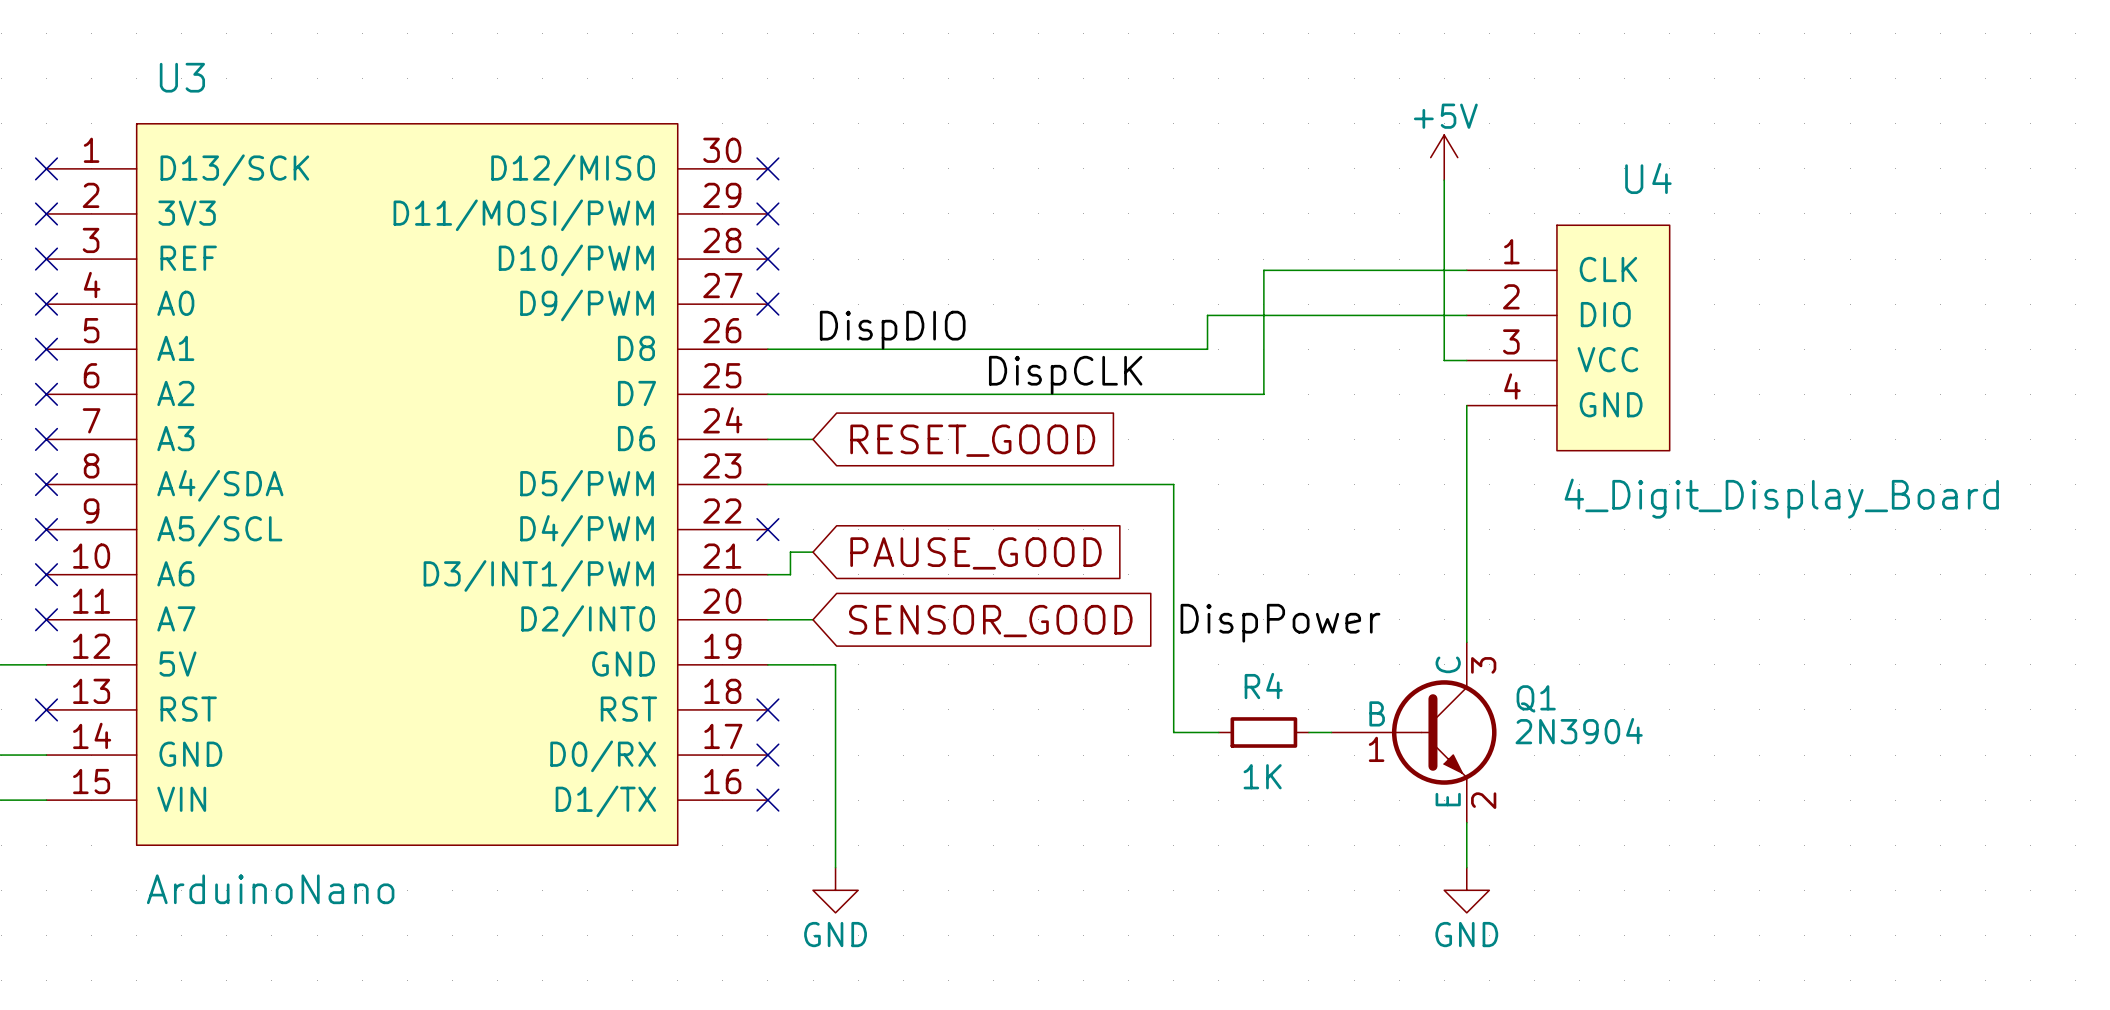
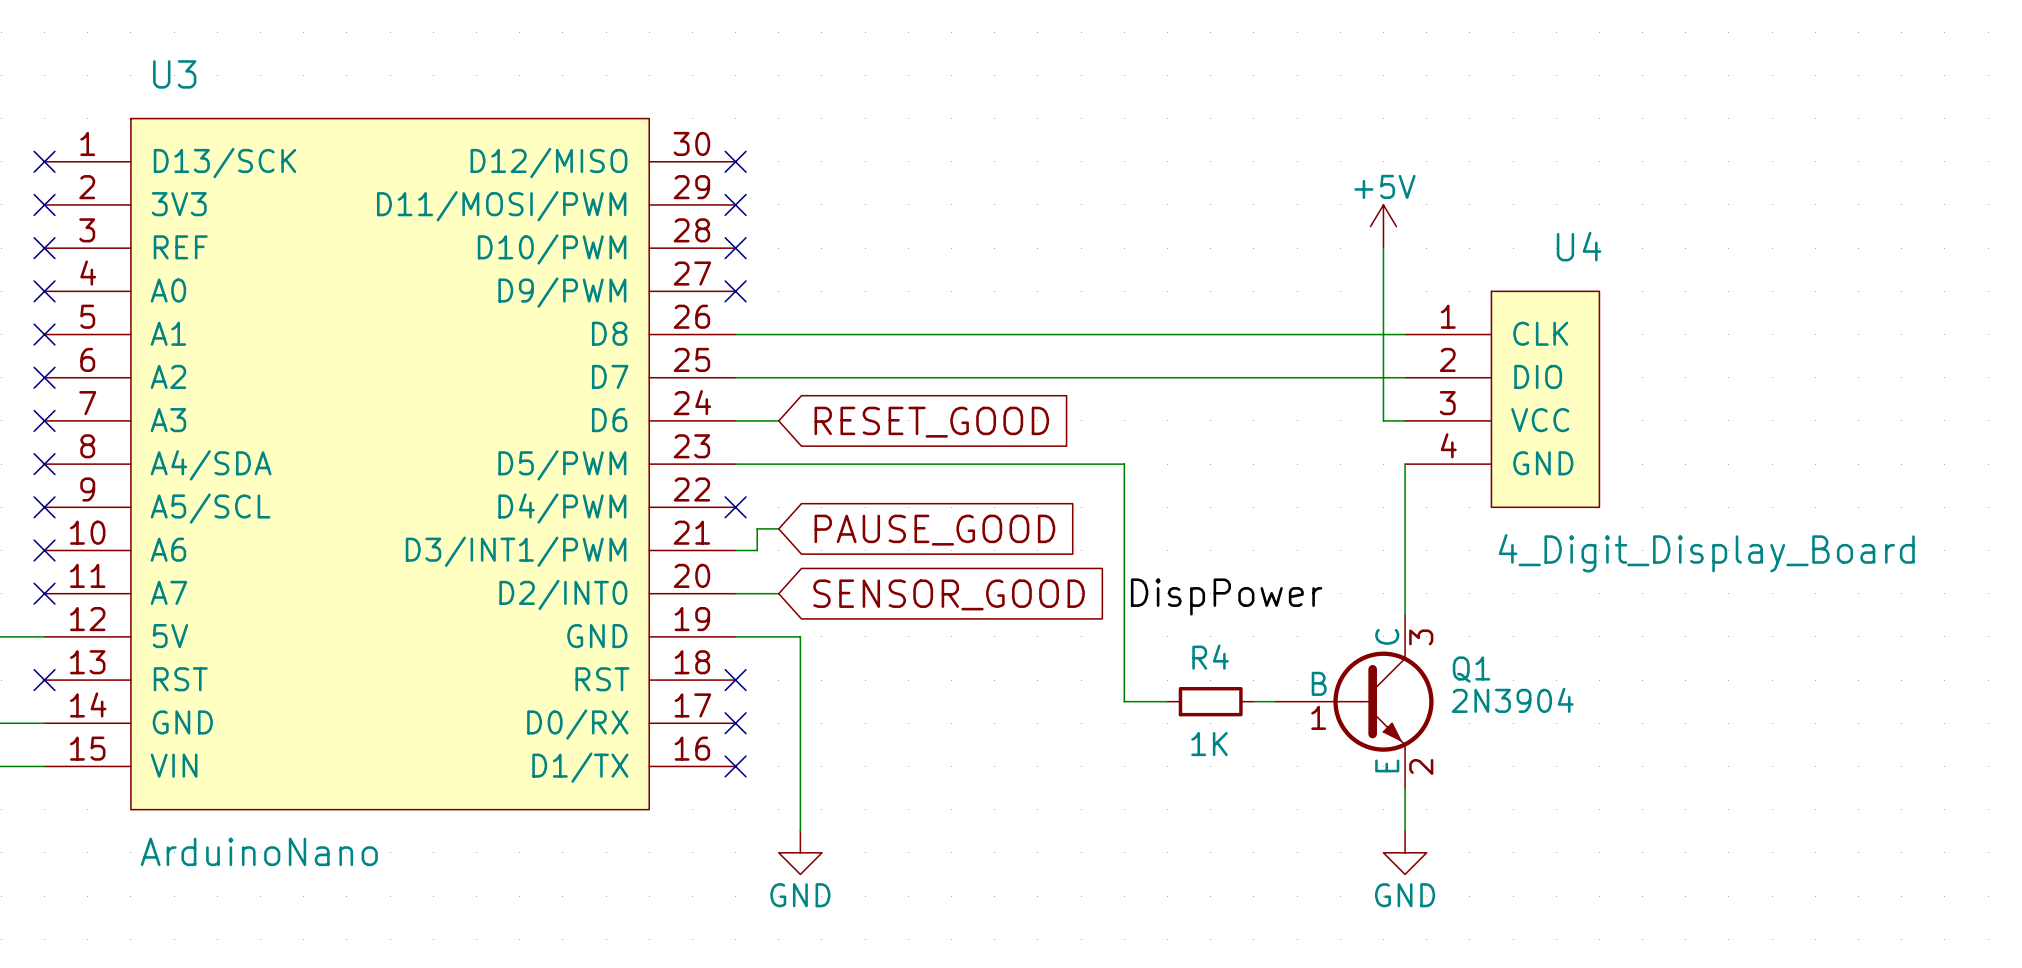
power symbol position: +5V (1444, 157) -> +5V (1383, 226)
wire: (1466, 270) (1263, 270) (1263, 394) -> (1405, 377) (1210, 377)
wire: (1466, 315) (1207, 315) (1207, 349) -> (1405, 334) (1156, 334)
label: DispDIO (892, 330) -> none
U4 position: (1568, 337) -> (1502, 399)
wire: (1444, 360) (1466, 360) -> (1383, 345) (1383, 420) (1405, 420)
label: DispCLK (1065, 375) -> none
wire: (1466, 405) (1466, 484) -> none

